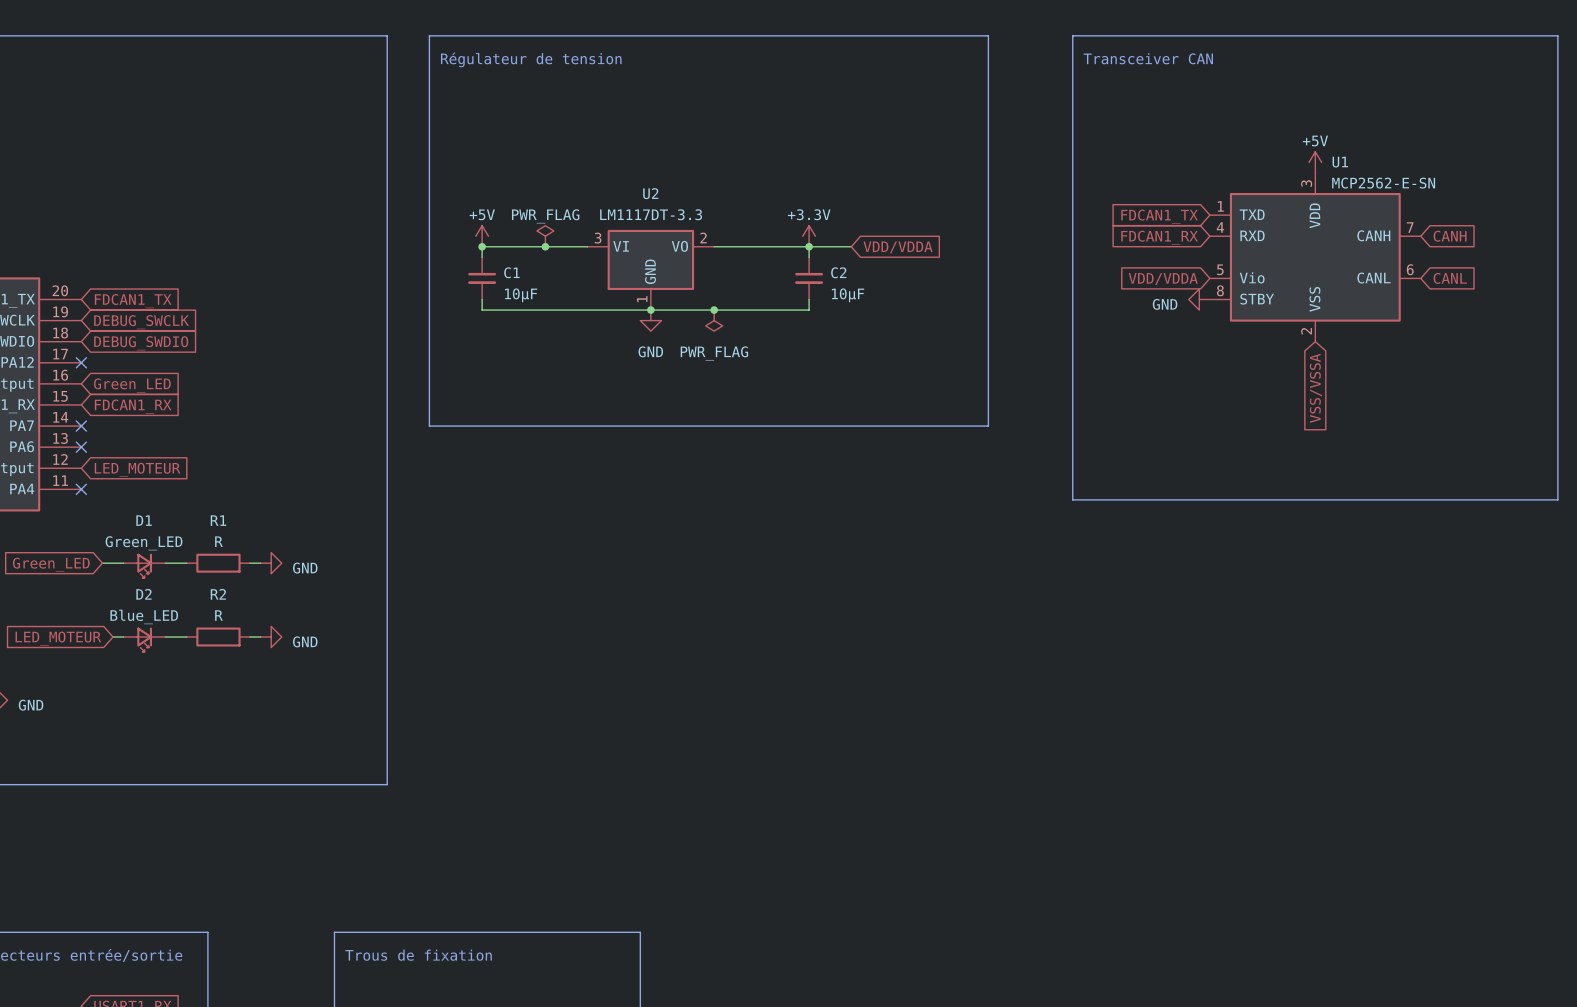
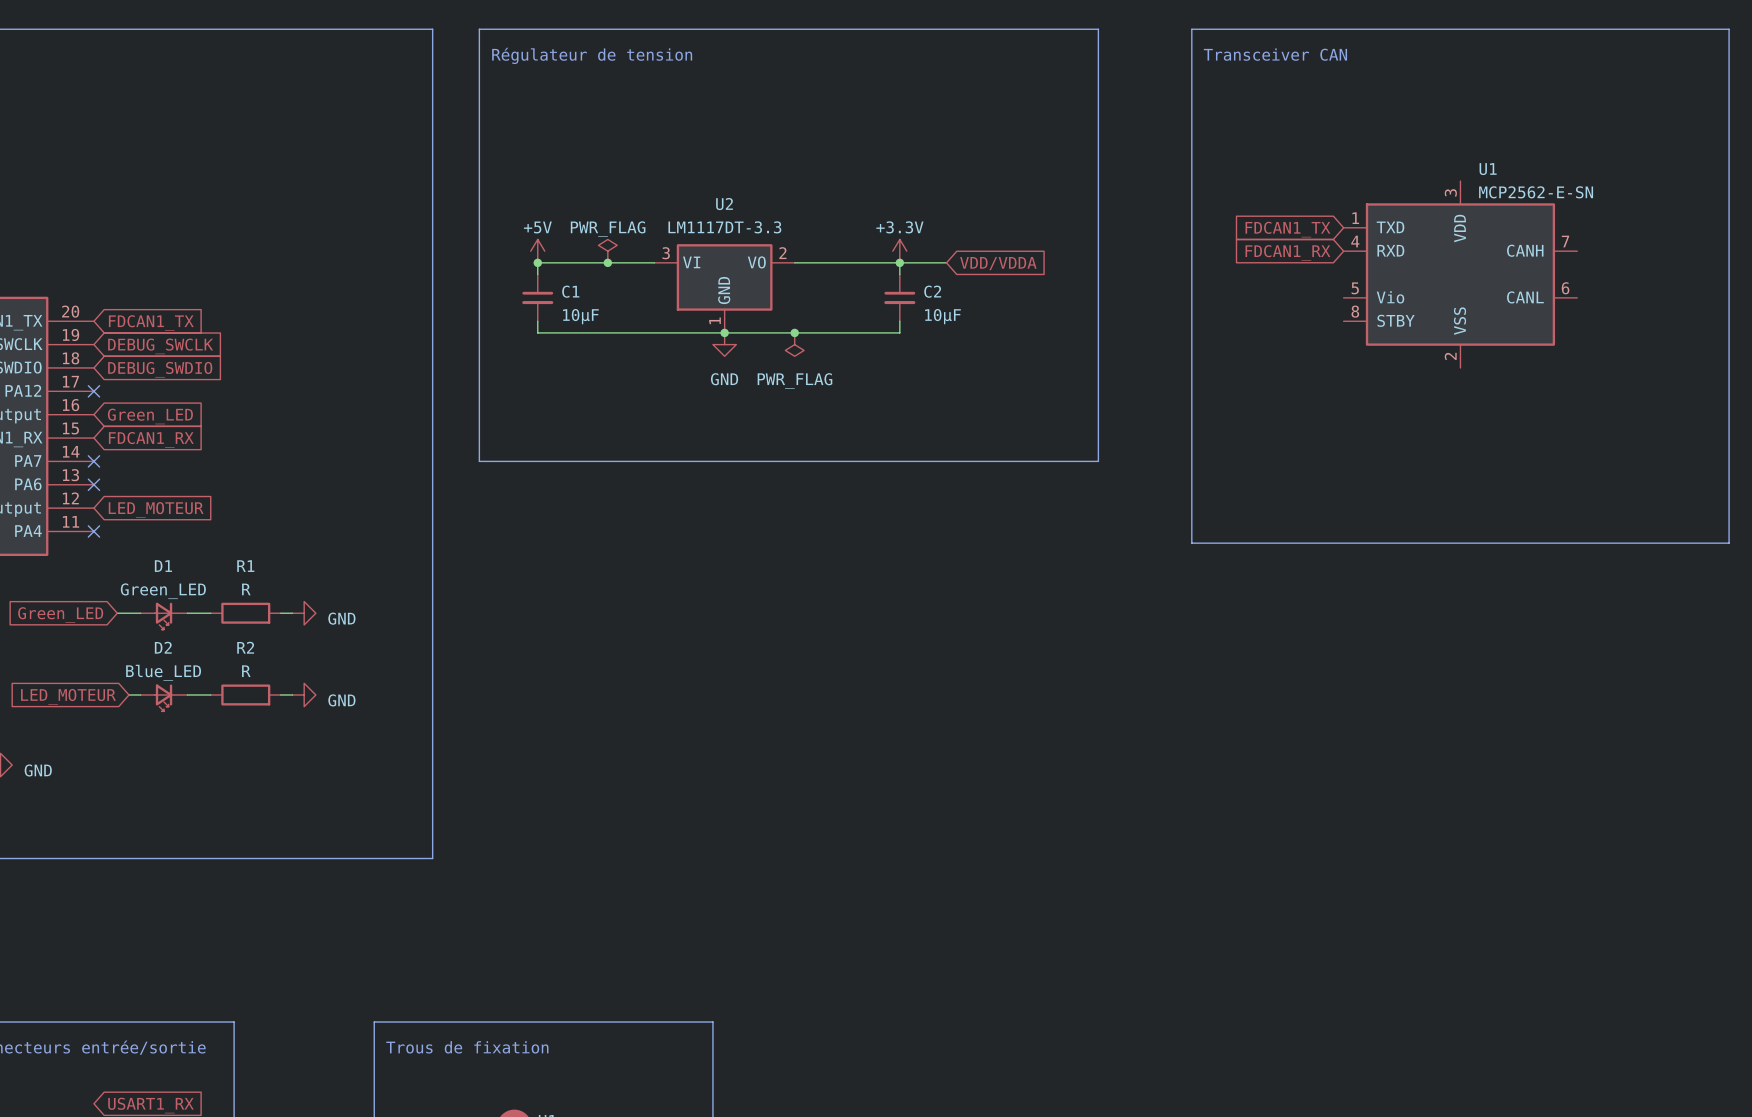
power symbol: +5V (1315, 162) -> none
global label: CANH (1450, 236) -> none
global label: CANL (1450, 278) -> none
global label: VDD/VDDA (1163, 279) -> none
power symbol: GND (1199, 299) -> none
global label: VSS/VSSA (1315, 388) -> none

